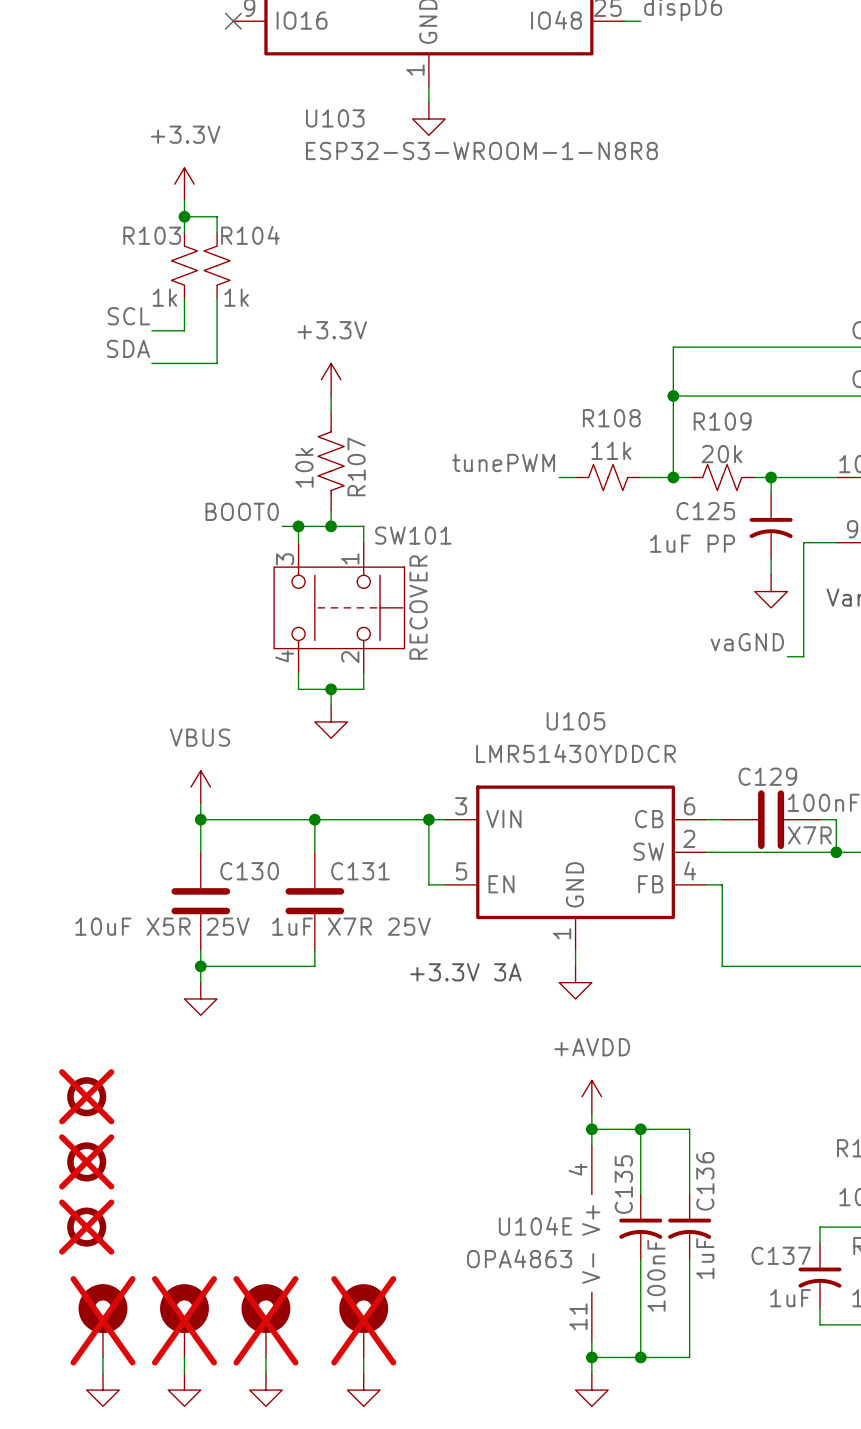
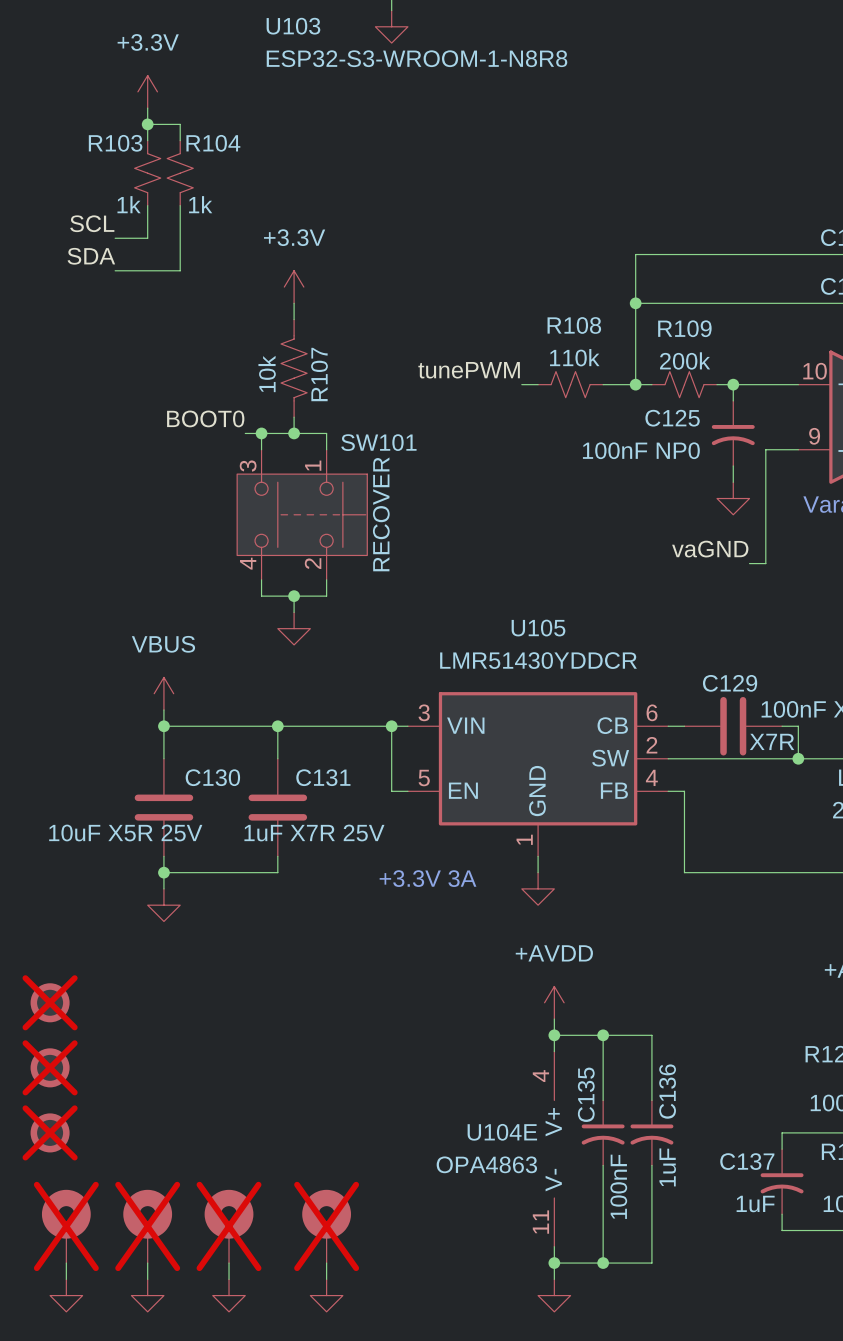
R108 value: 11k (611, 450) -> 110k (574, 357)
R109 value: 20k (721, 454) -> 200k (685, 360)
C125 value: 1uF PP (692, 543) -> 100nF NP0 (641, 450)

